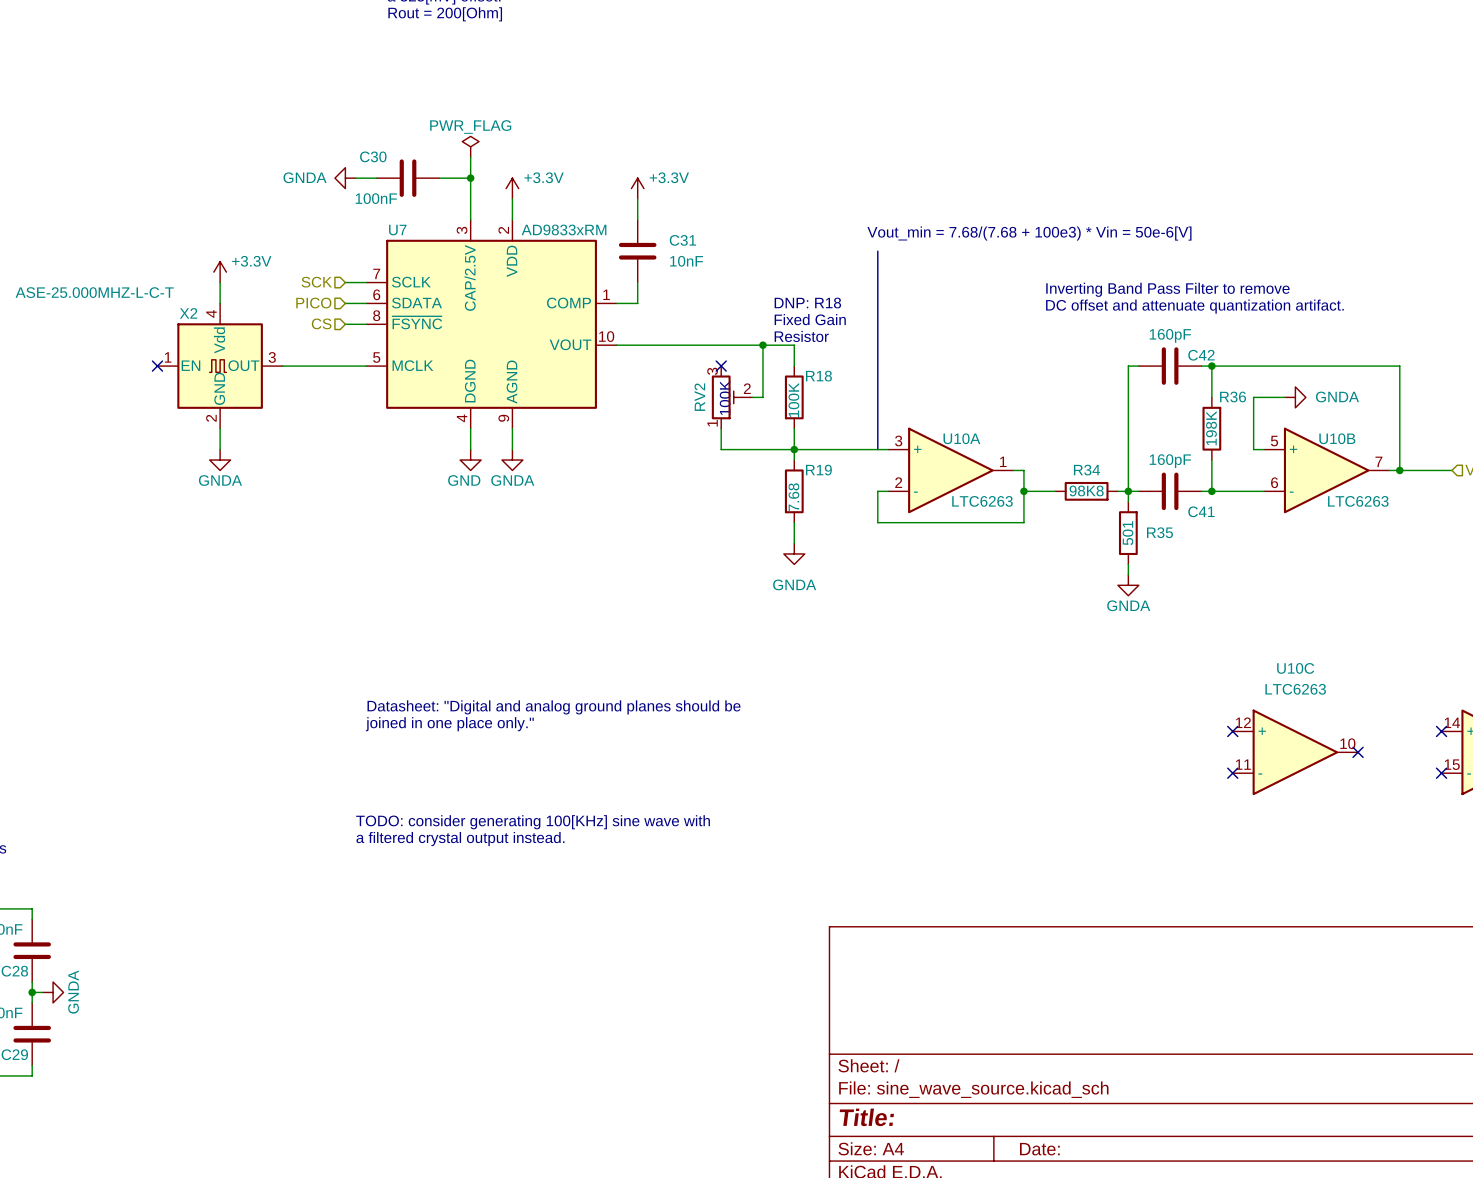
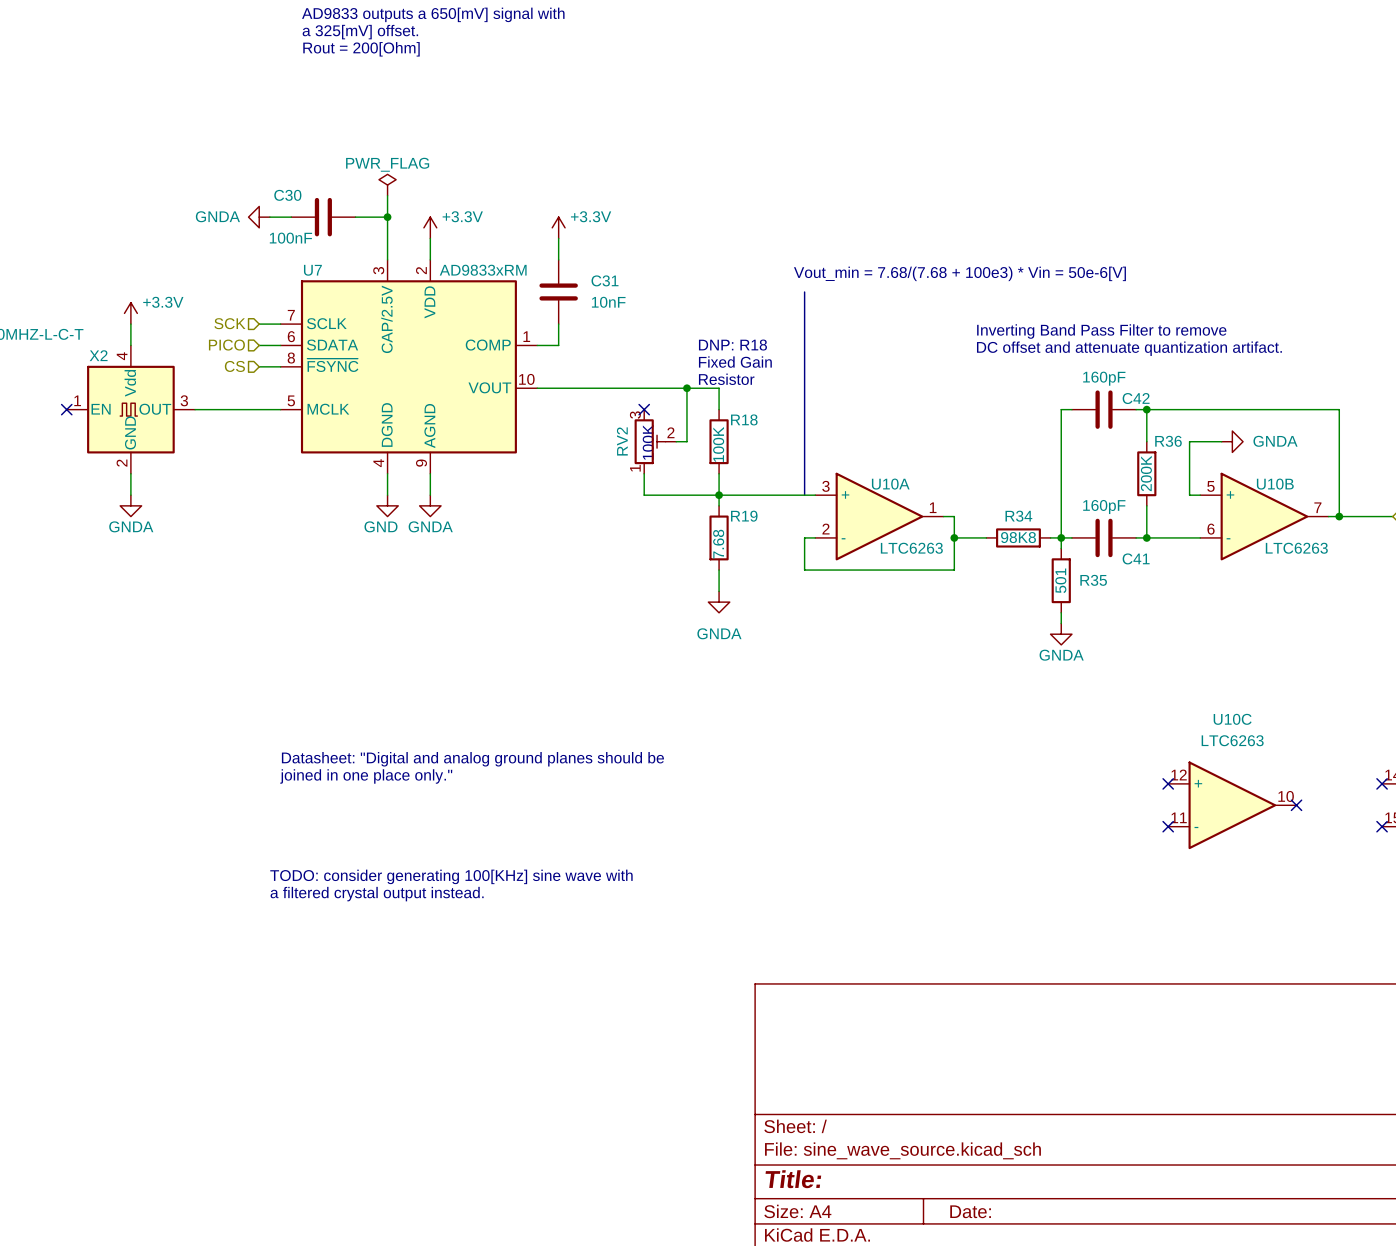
R36 value: 198K (1211, 428) -> 200K (1146, 473)

